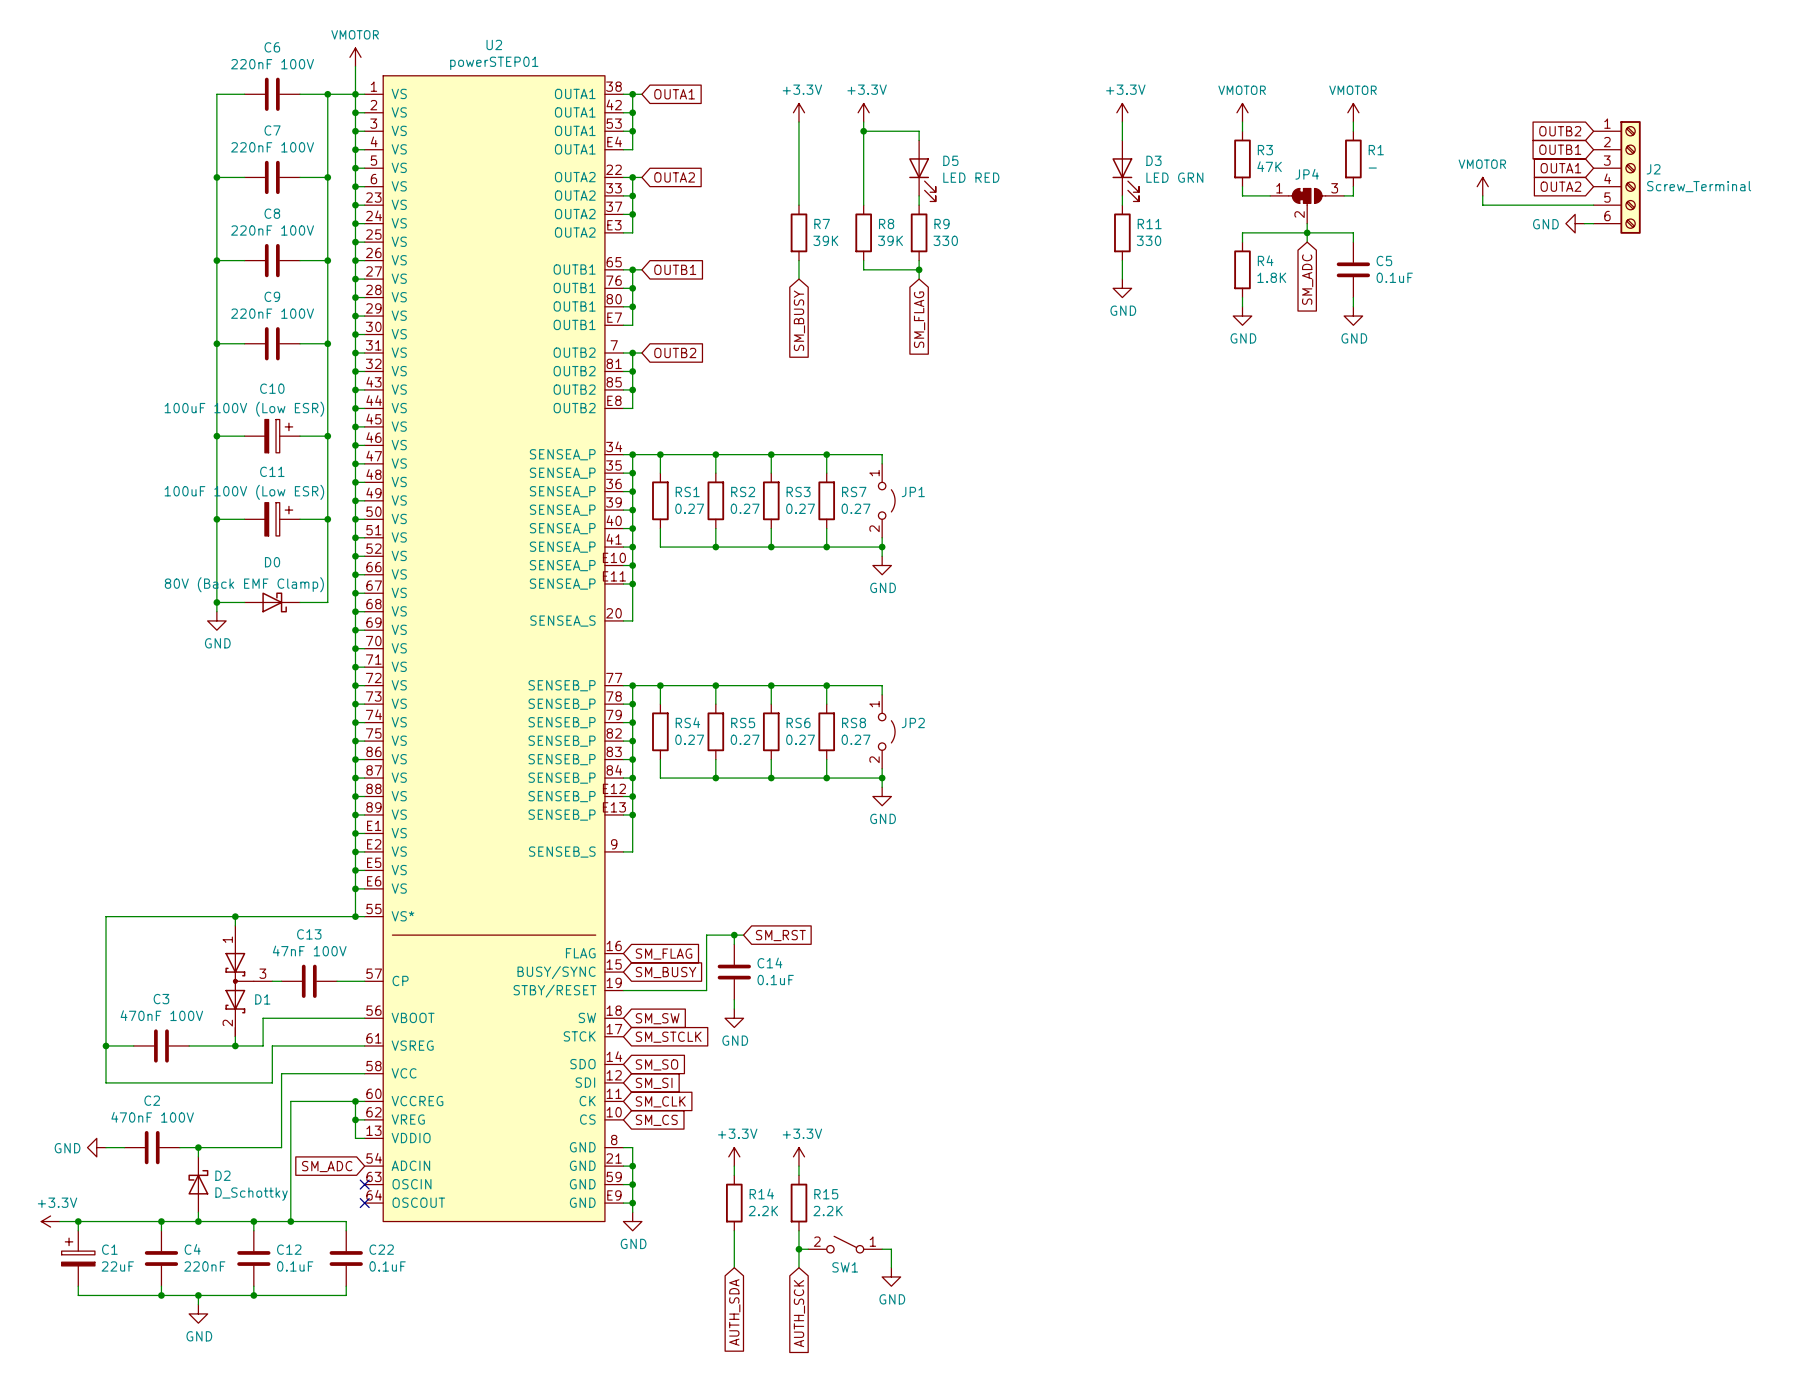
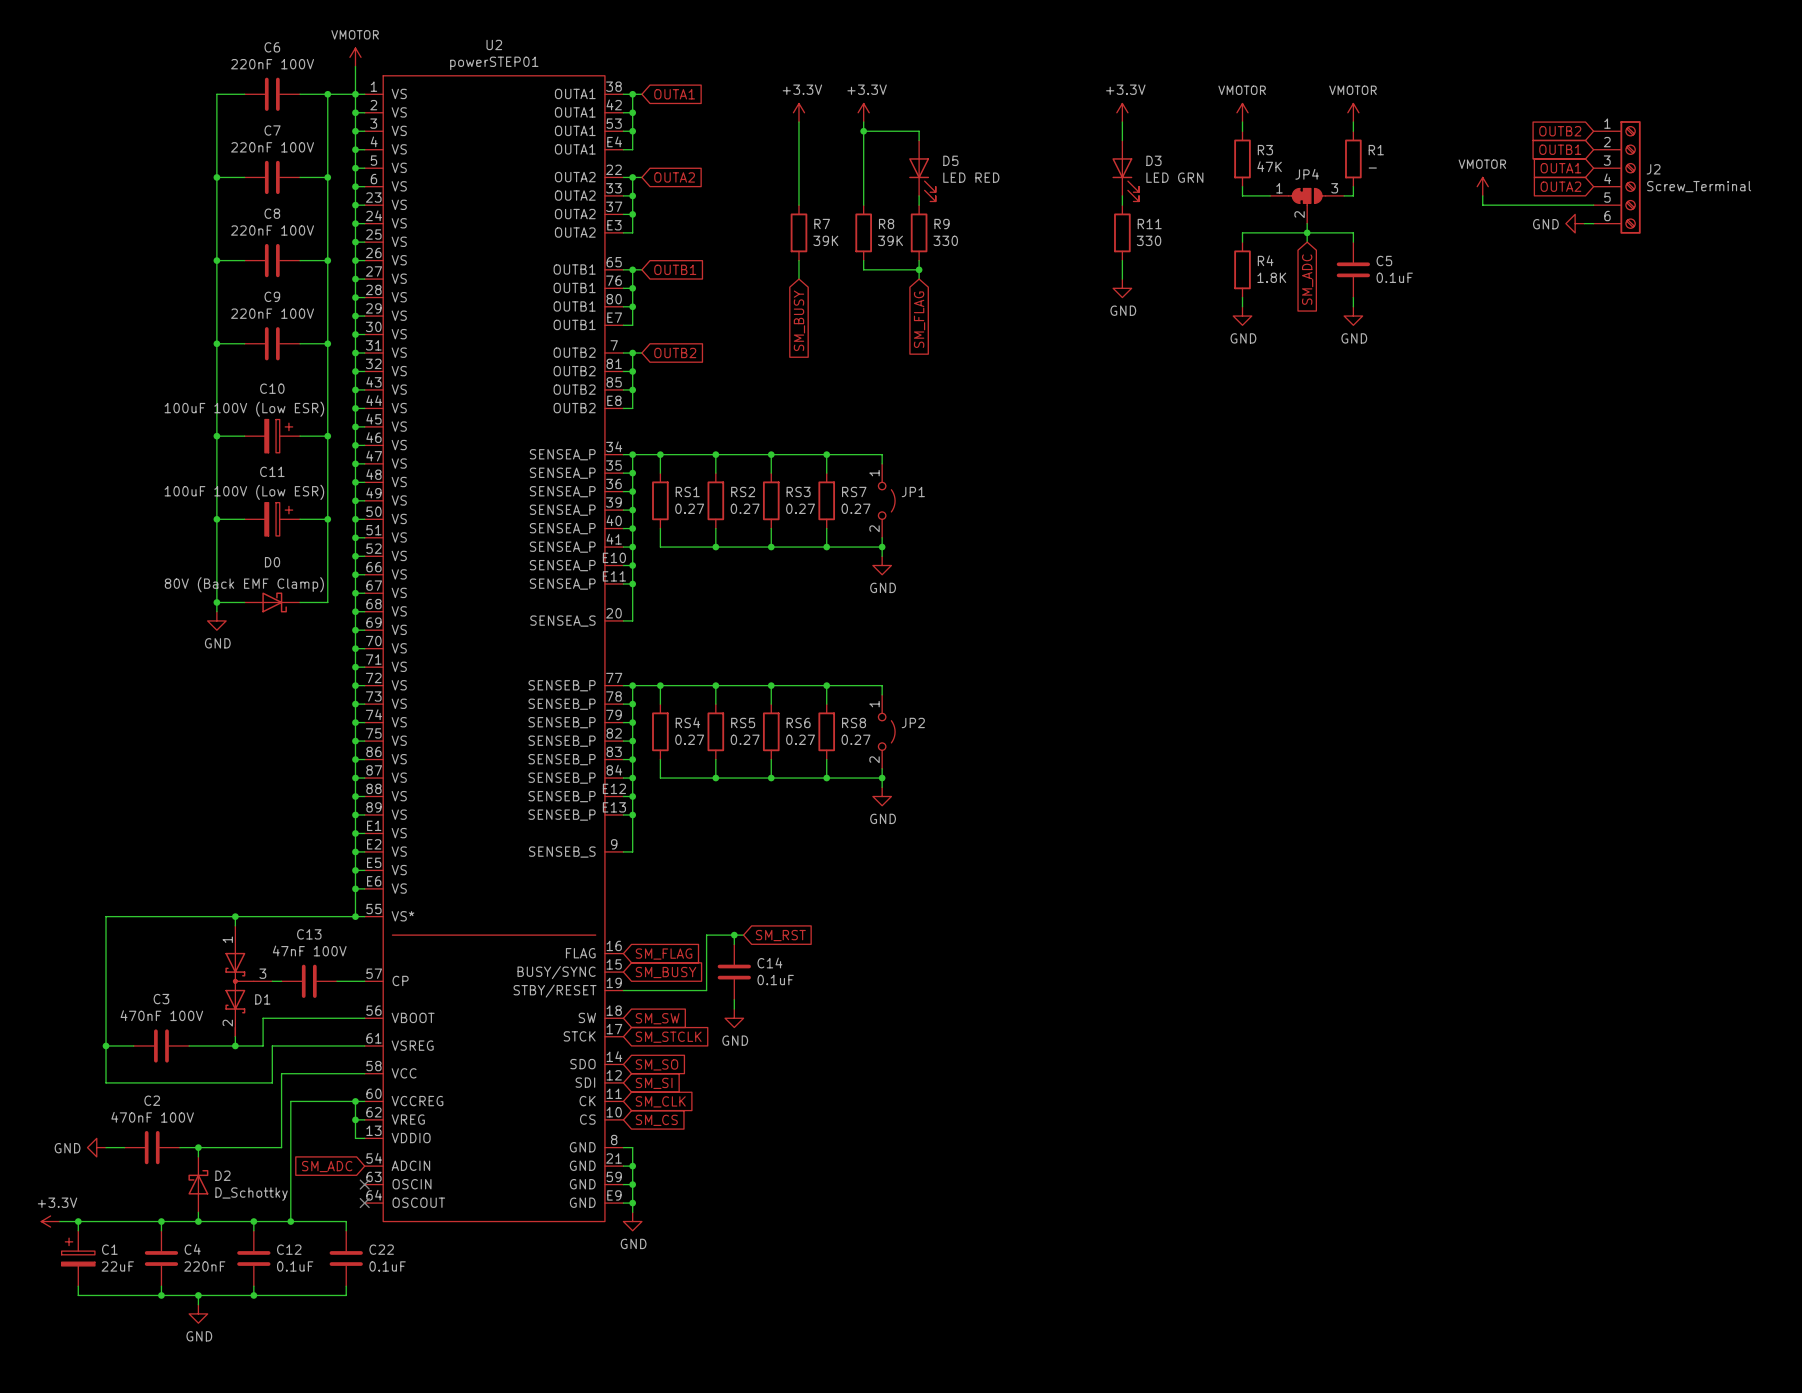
power symbol: +3.3V (734, 1156) -> none
power symbol: +3.3V (798, 1156) -> none
wire: (734, 1166) (734, 1175) -> none
wire: (798, 1166) (798, 1175) -> none
R14: 2.2K (734, 1203) -> none
R15: 2.2K (798, 1203) -> none
wire: (734, 1230) (734, 1267) -> none
wire: (798, 1230) (798, 1267) -> none
SW1: (845, 1244) -> none
wire: (798, 1249) (808, 1249) -> none
junction: (798, 1249) -> none
wire: (882, 1249) (891, 1249) (891, 1267) -> none
power symbol: GND (891, 1276) -> none
global label: AUTH_SDA (734, 1312) -> none
global label: AUTH_SCK (799, 1313) -> none

